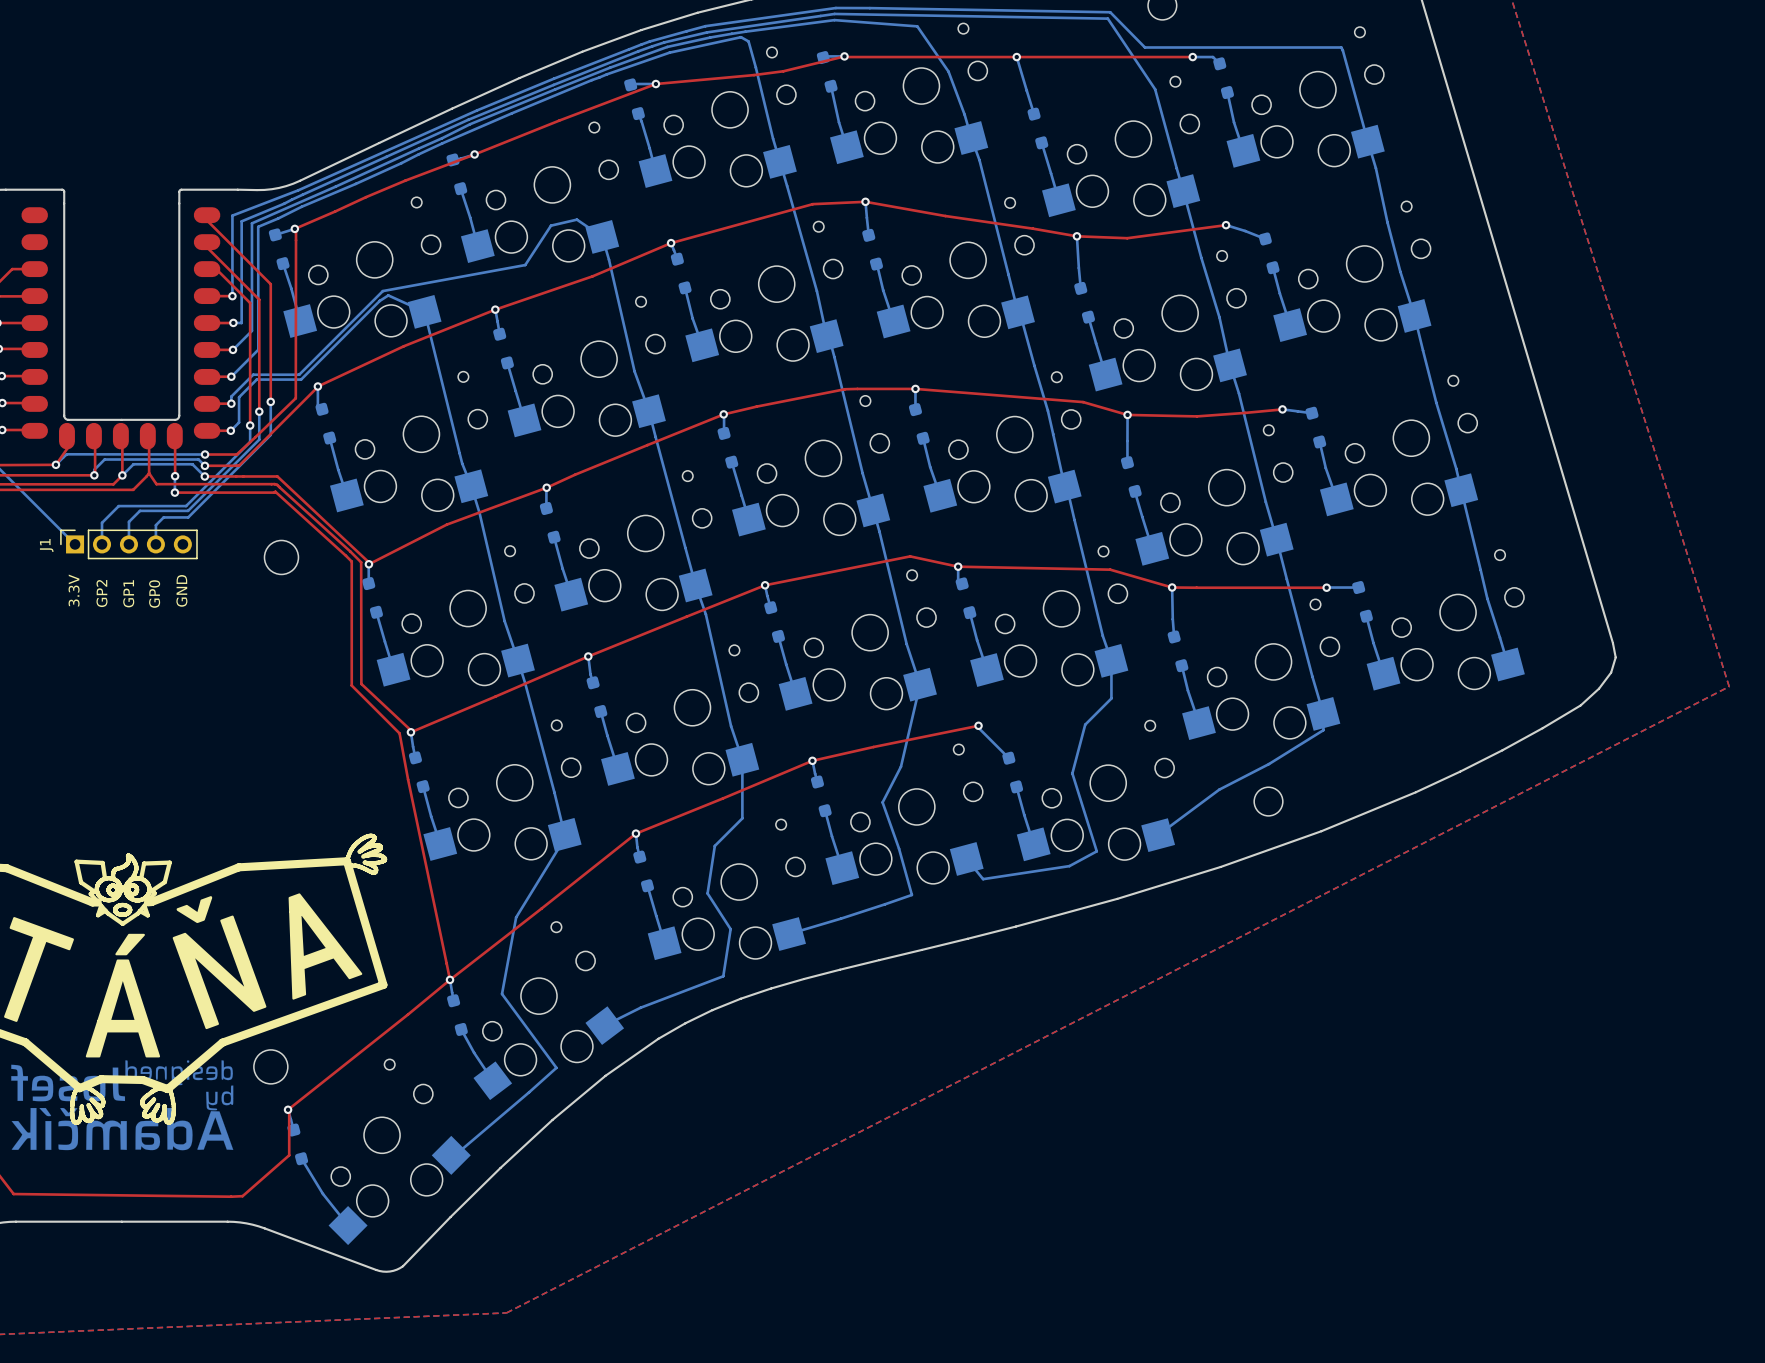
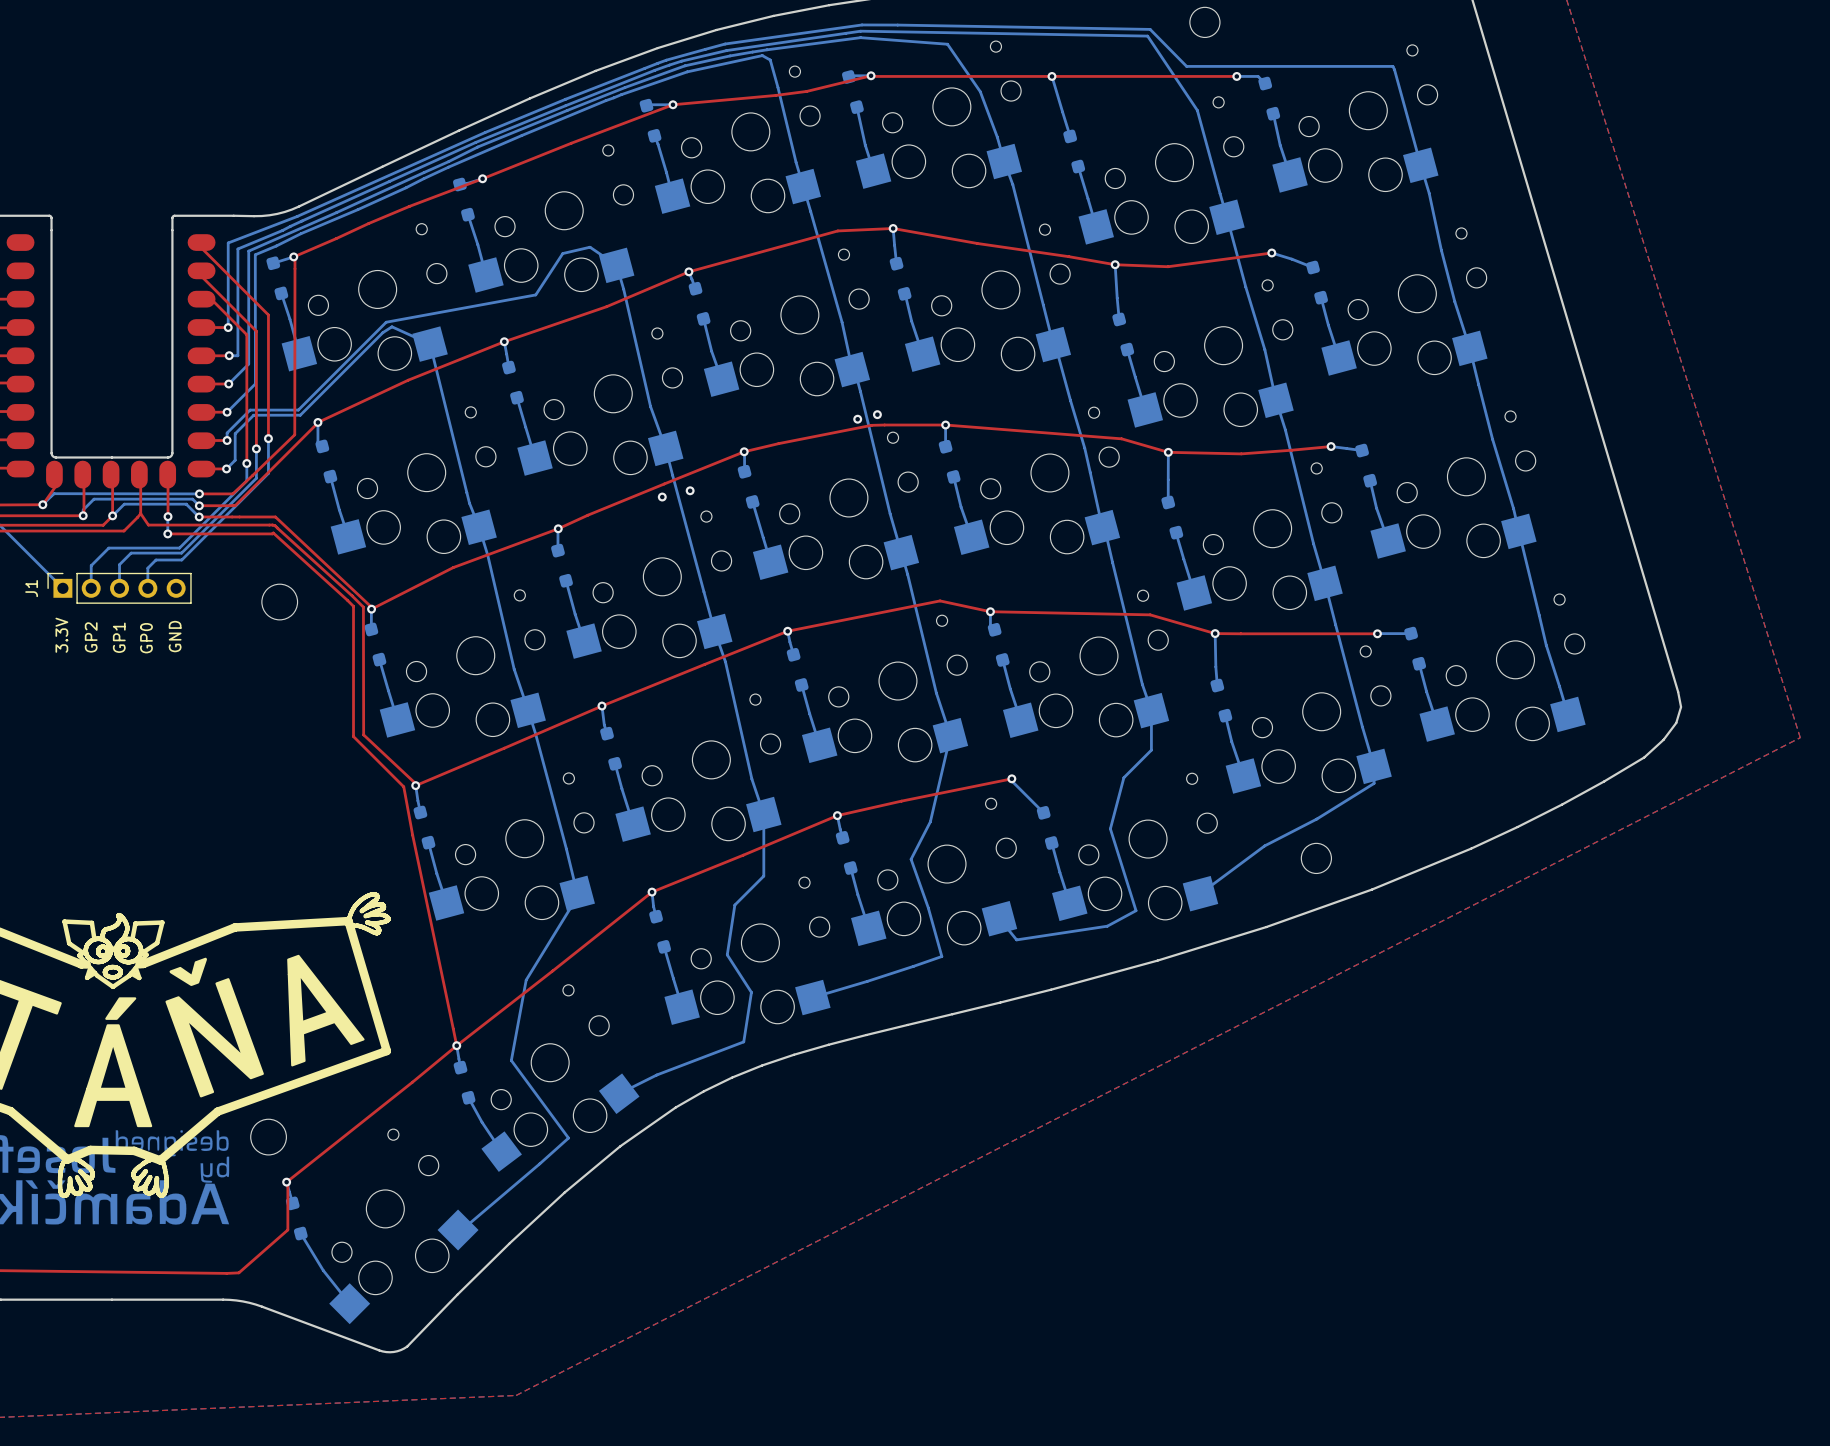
via: none -> (877, 414)
via: none -> (857, 419)
via: none -> (690, 490)
via: none -> (662, 497)

